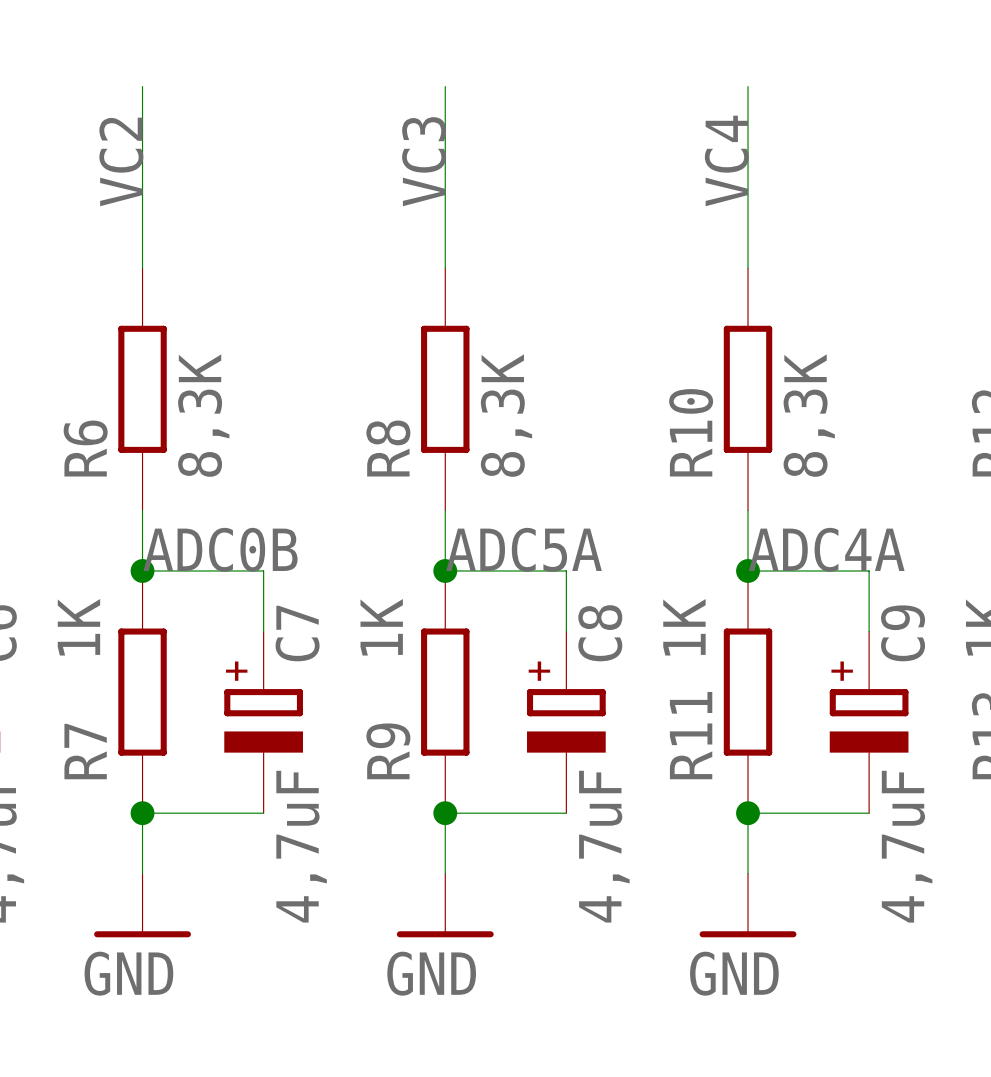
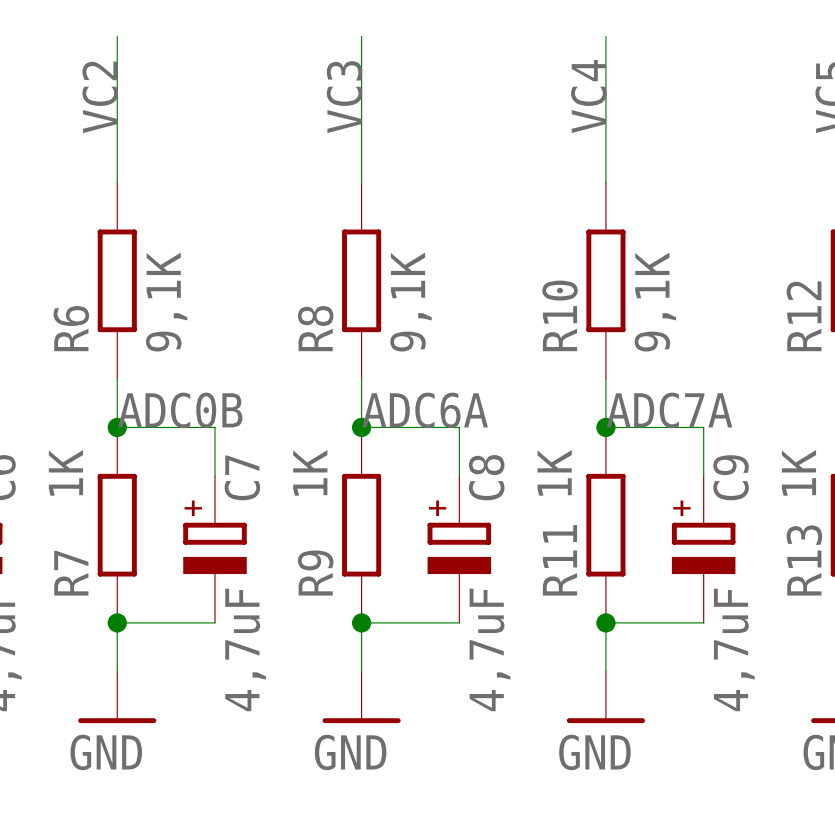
R6 value: 8,3K (203, 415) -> 9,1K (166, 302)
R8 value: 8,3K (506, 415) -> 9,1K (411, 302)
R10 value: 8,3K (809, 415) -> 9,1K (655, 302)
label: ADC5A (524, 549) -> ADC6A (425, 410)
label: ADC4A (826, 549) -> ADC7A (669, 410)

